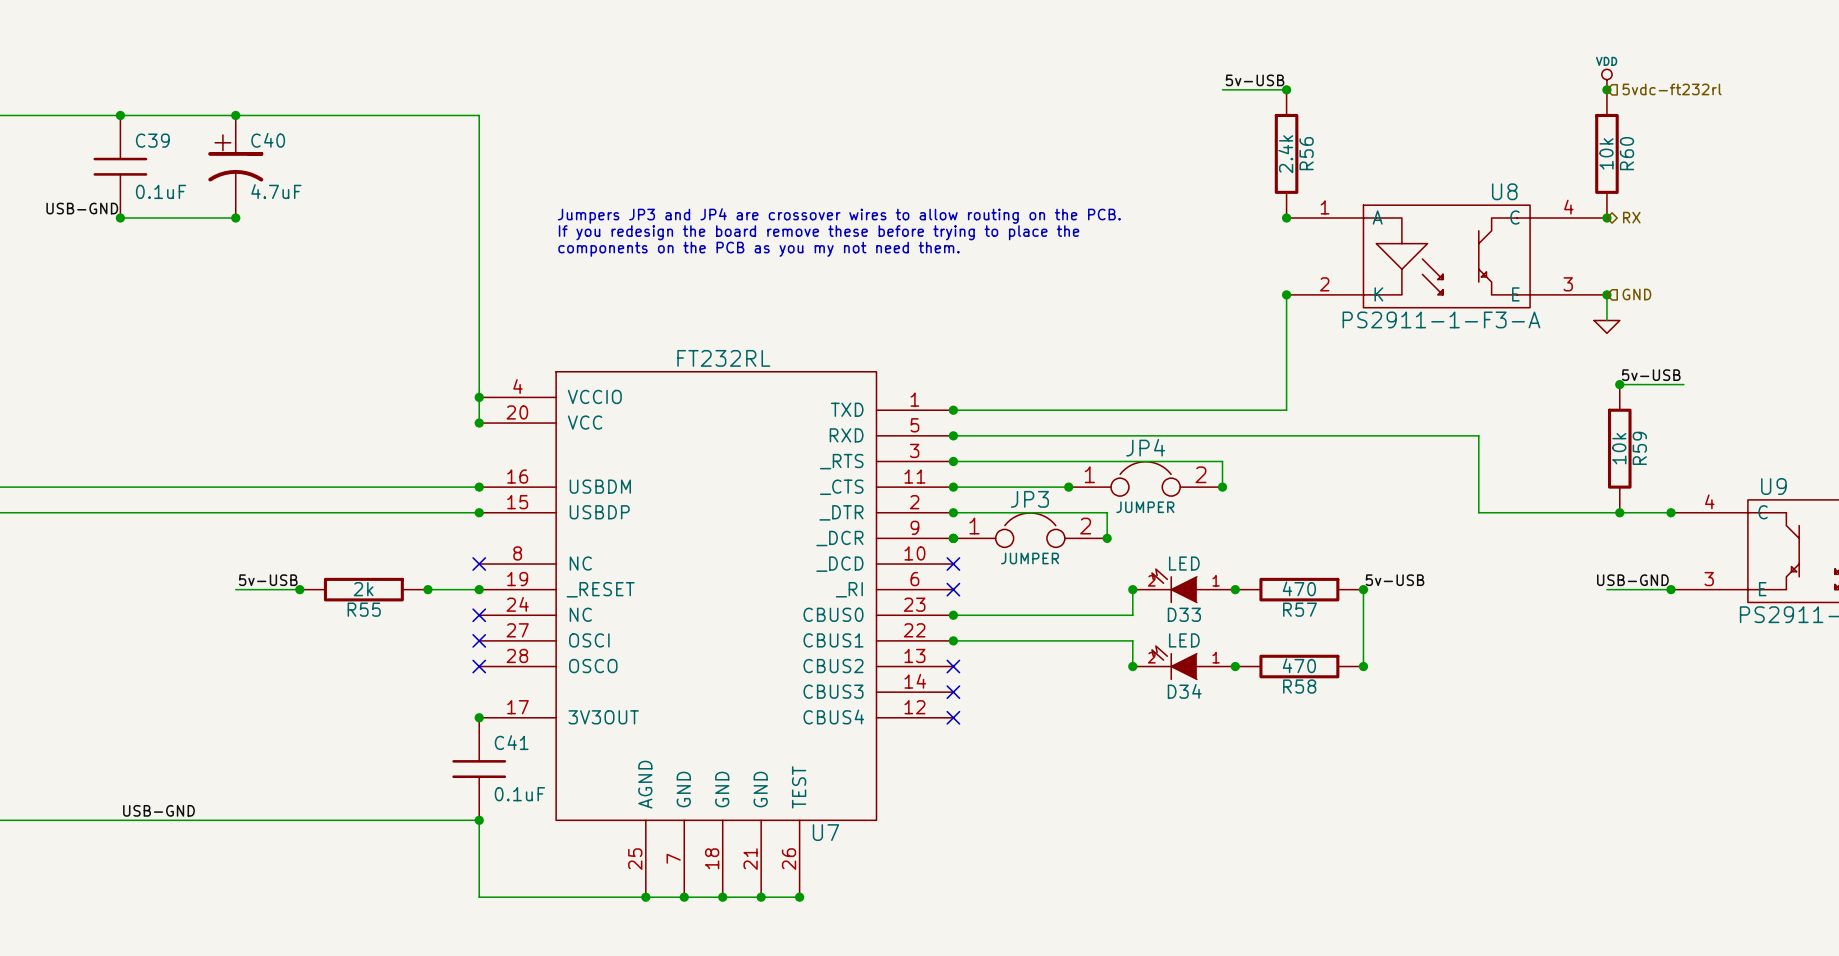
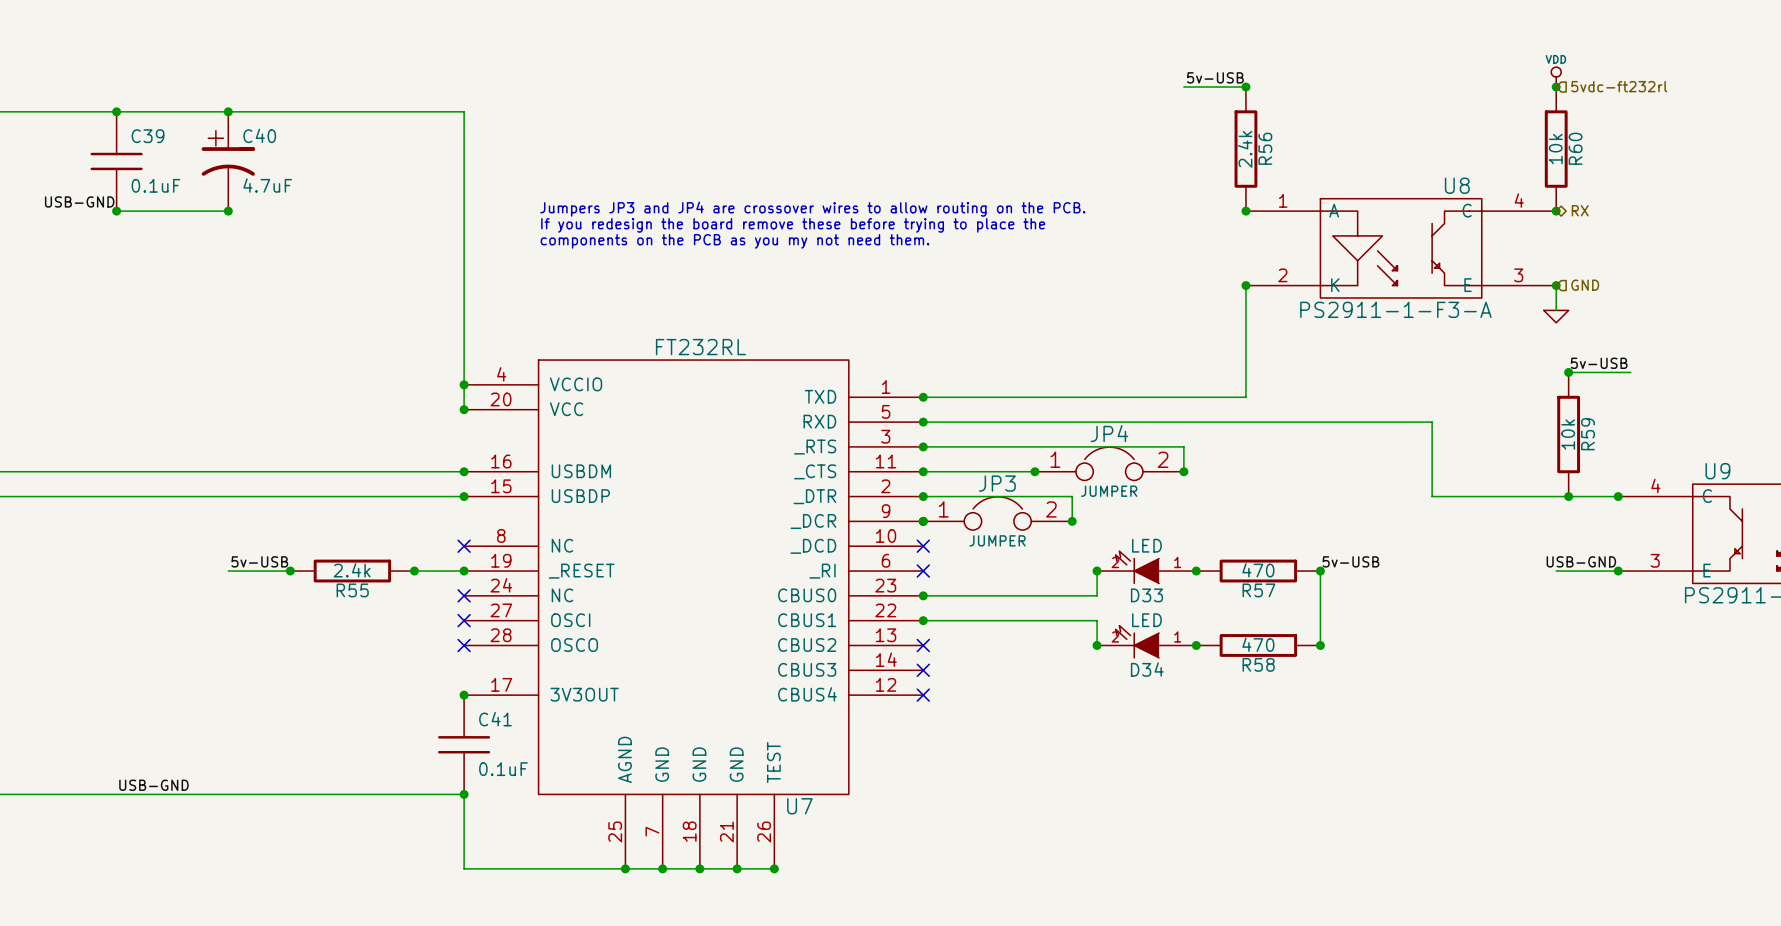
R55 value: 2k (363, 589) -> 2.4k (352, 570)

